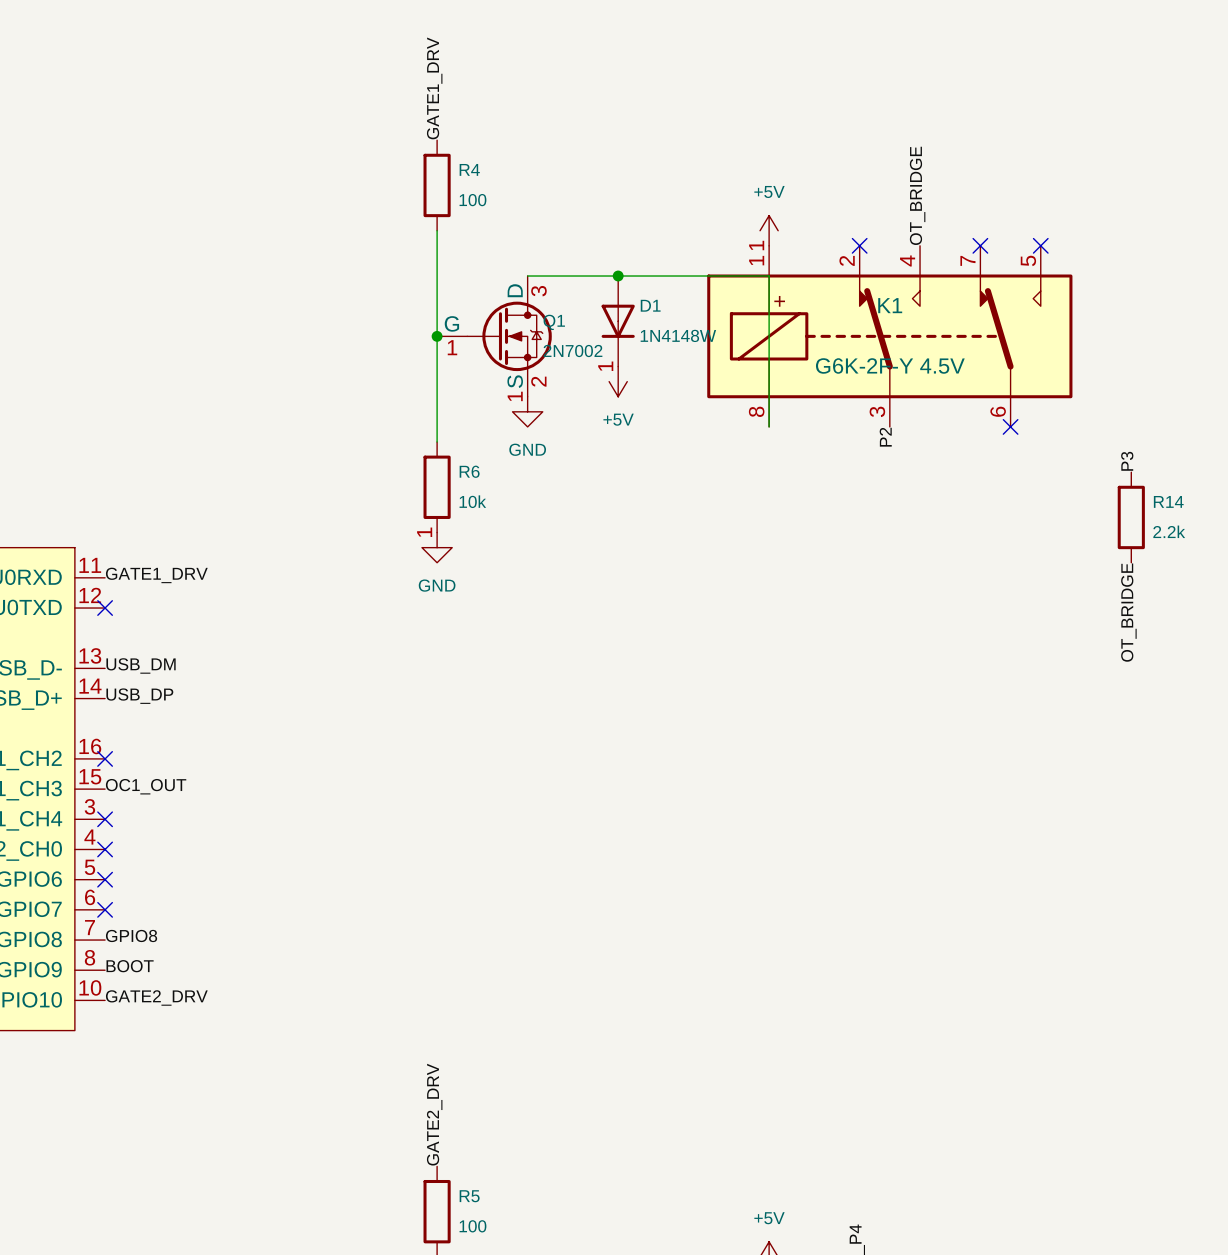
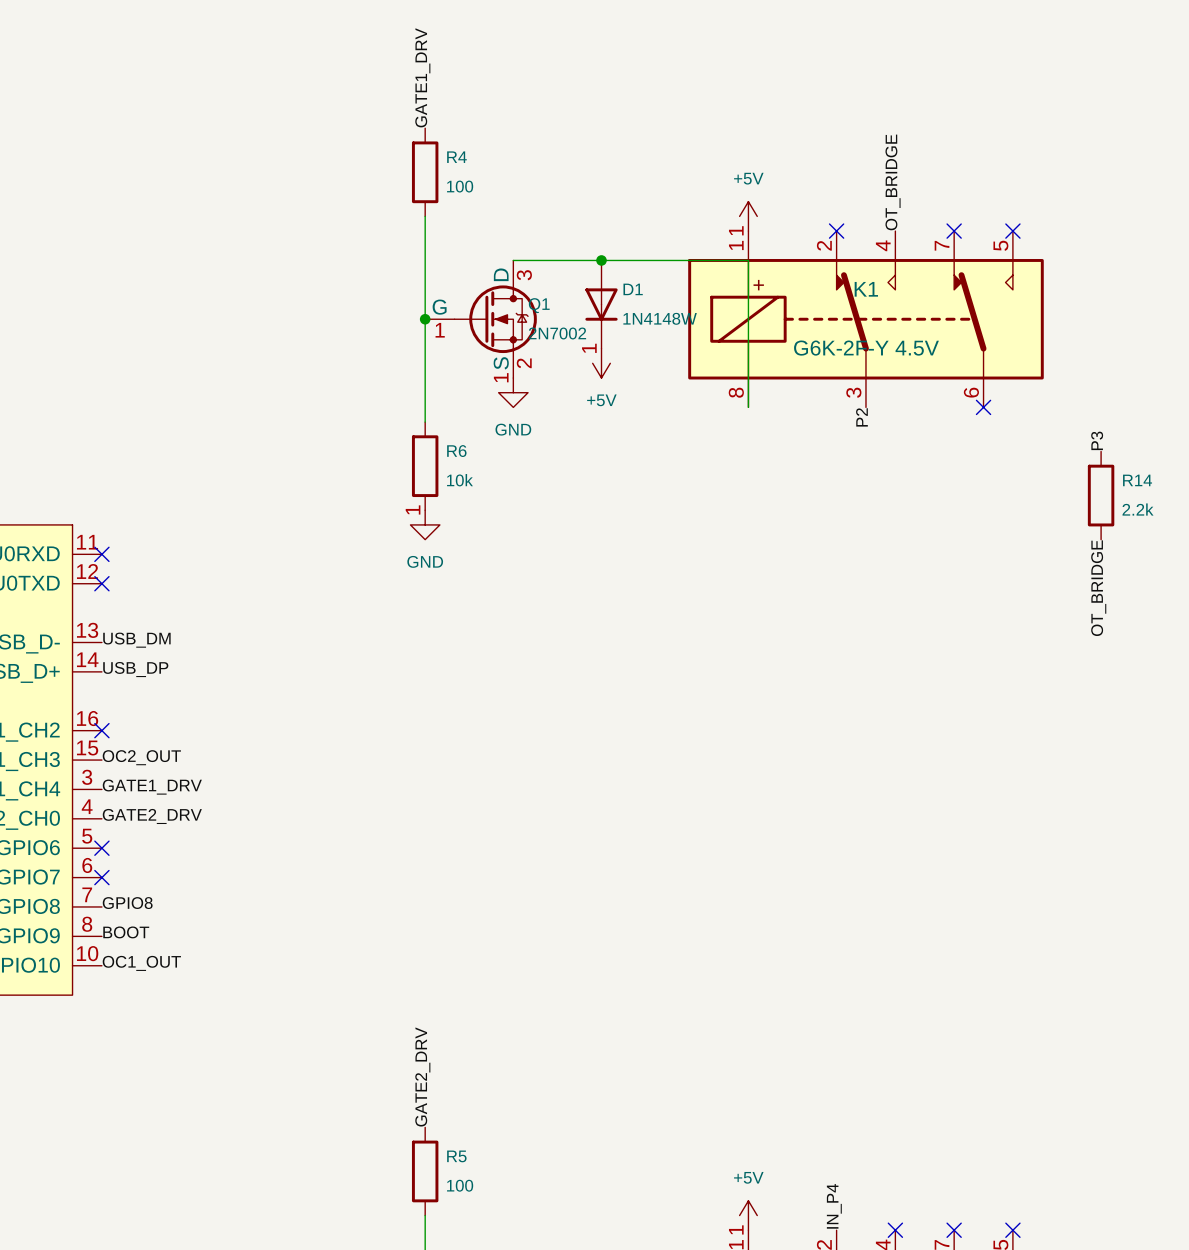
label position: GATE1_DRV (156, 575) -> GATE1_DRV (152, 787)
no-connect mark: none -> (101, 554)
label: OC1_OUT (146, 786) -> OC2_OUT (141, 757)
no-connect mark: (105, 819) -> none
label: none -> GATE2_DRV (152, 816)
no-connect mark: (105, 849) -> none
label: GATE2_DRV (156, 997) -> OC1_OUT (141, 963)

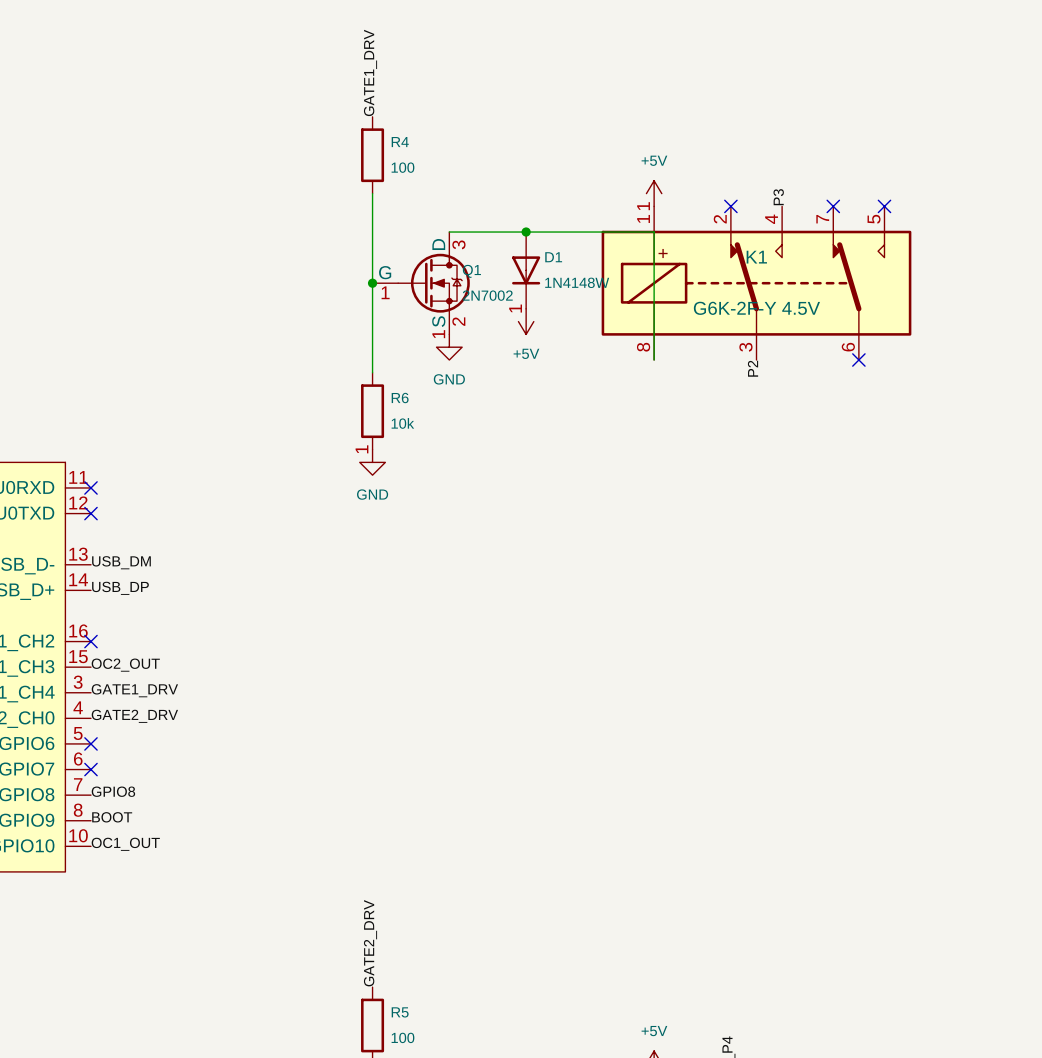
label: OT_BRIDGE (893, 182) -> P3 (778, 197)
label: P3 (1097, 440) -> none
R14: 2.2k (1101, 495) -> none
label: OT_BRIDGE (1098, 588) -> none

